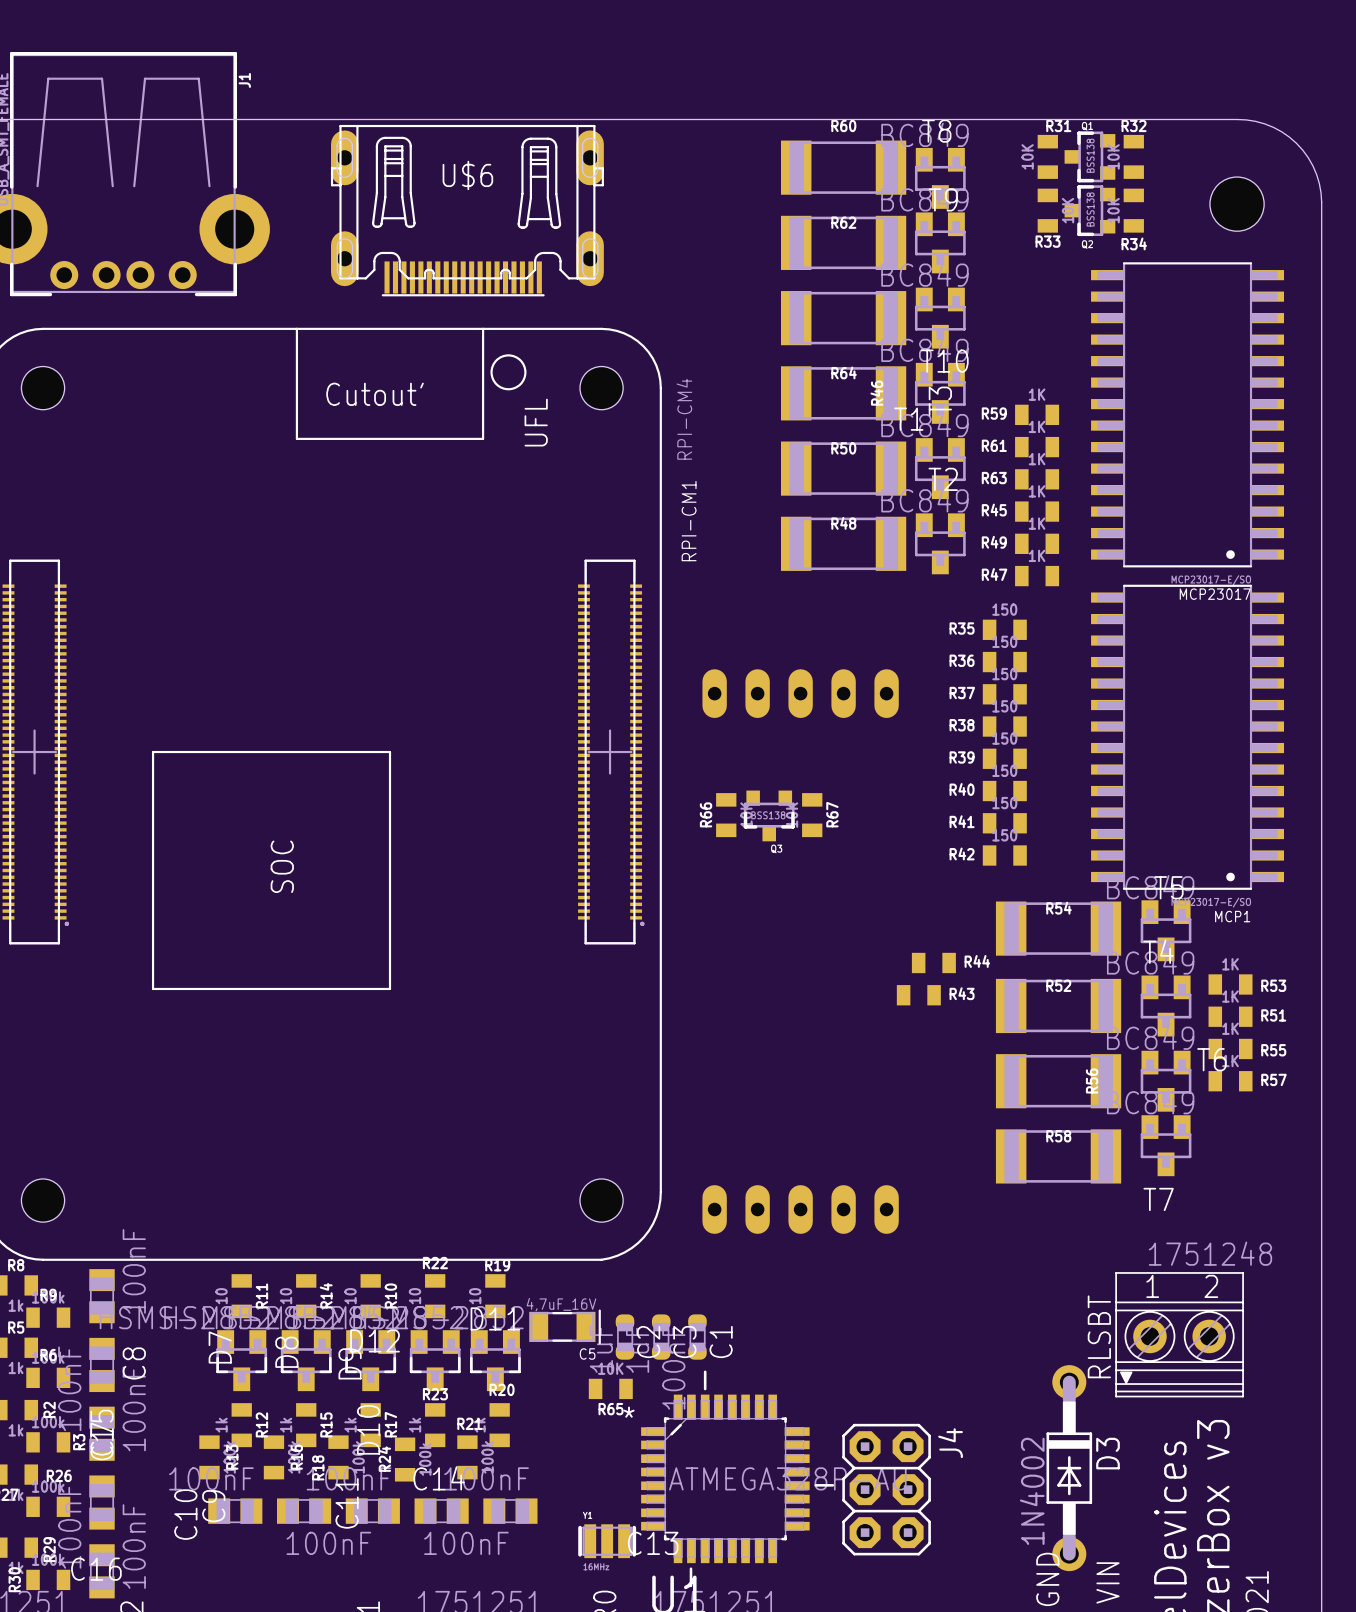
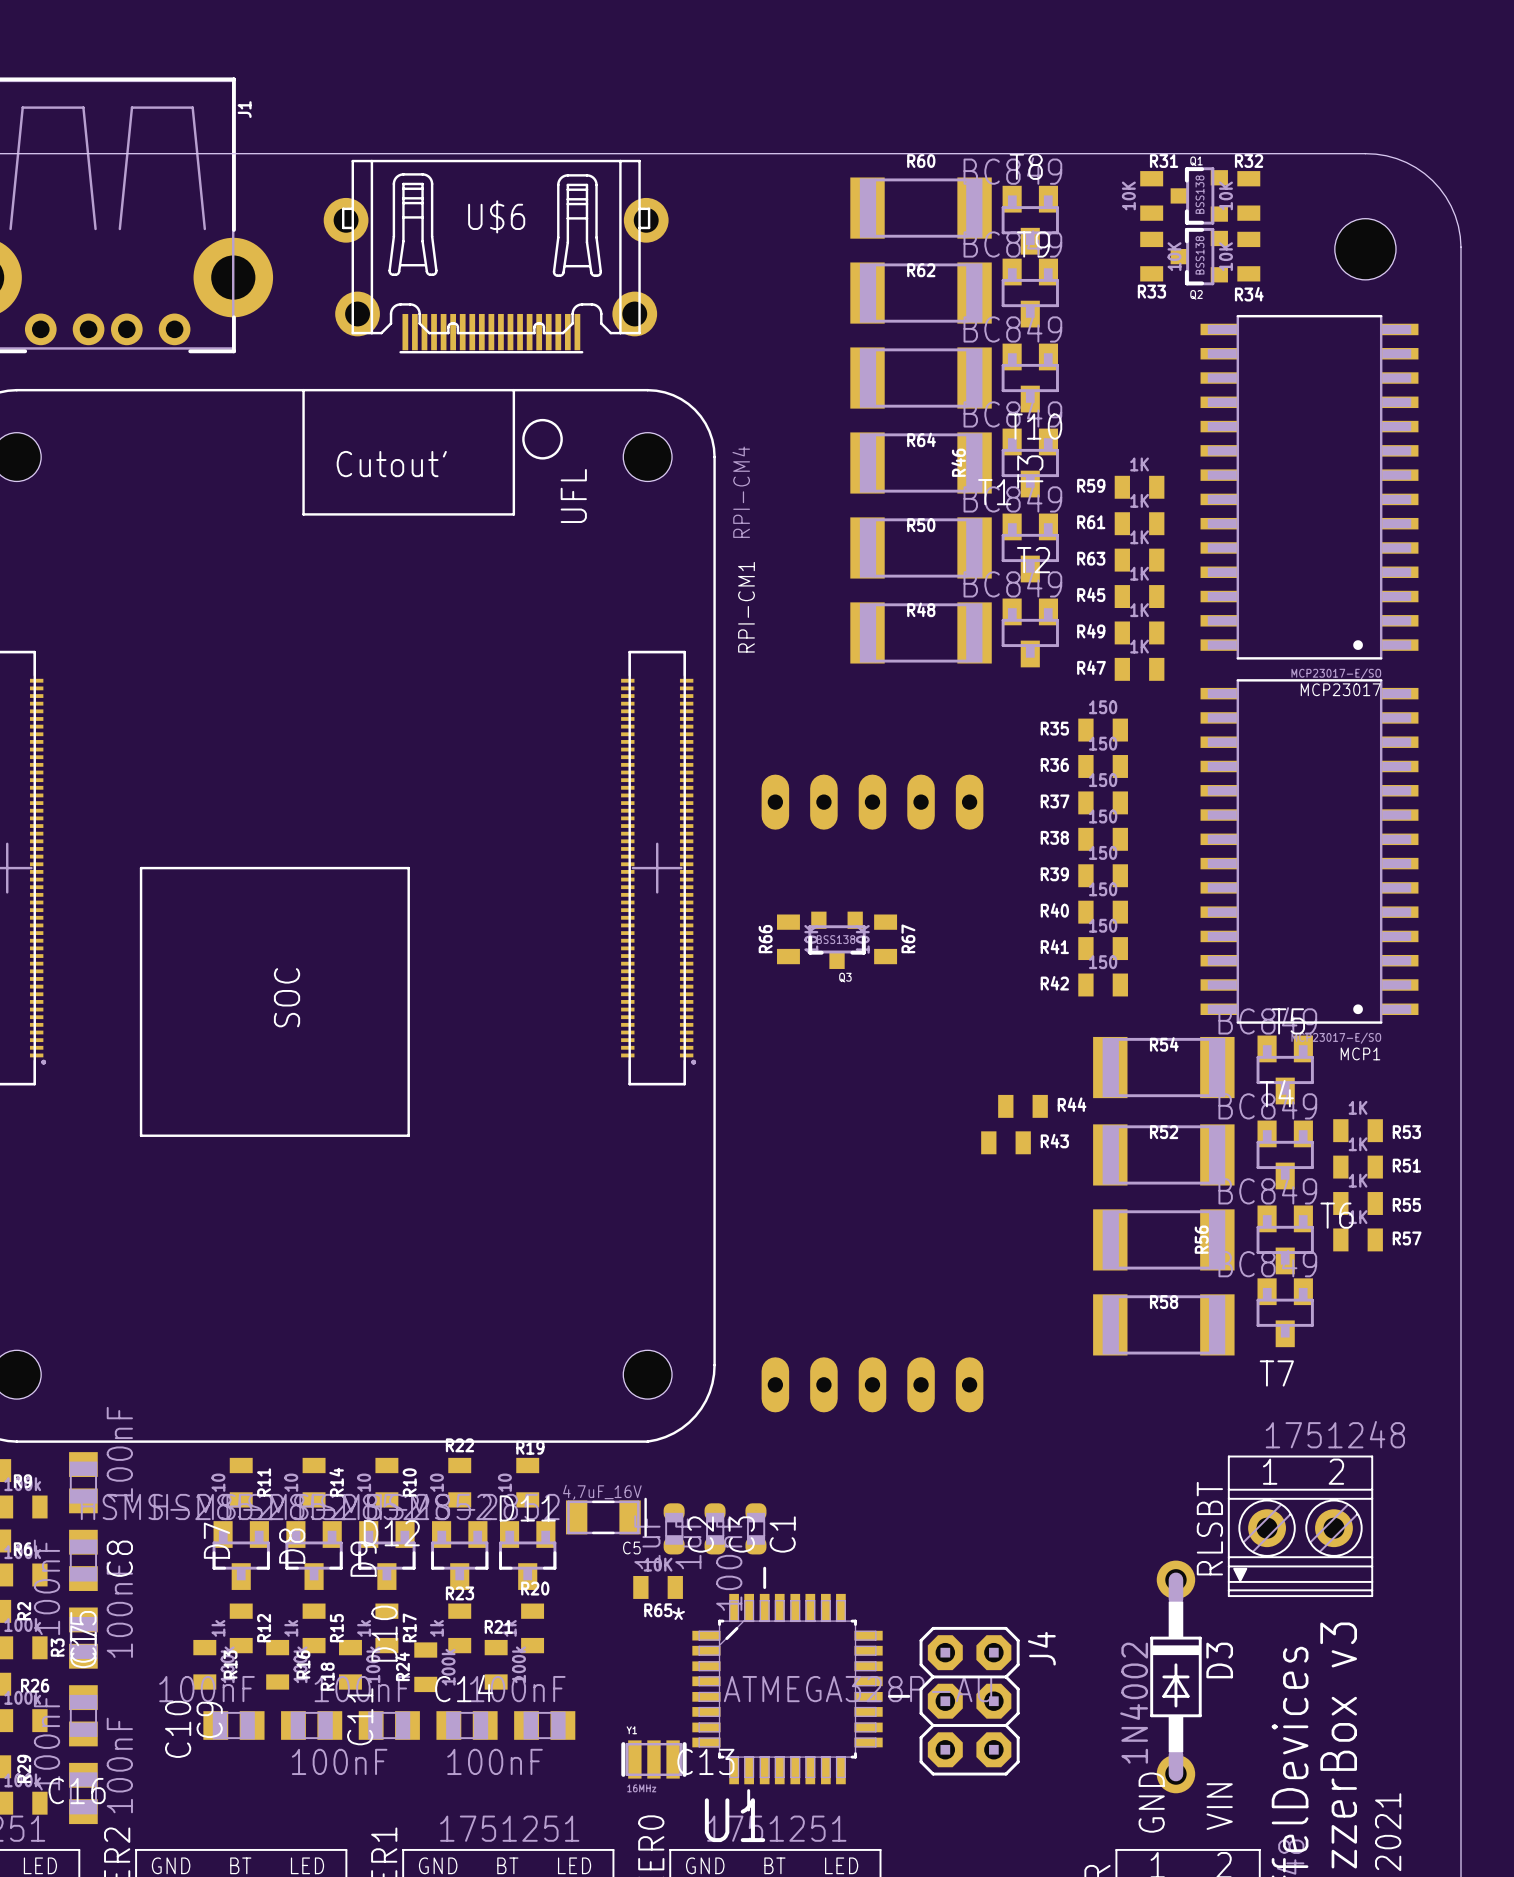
U$6 footprint: [330, 124, 604, 297] -> [323, 159, 669, 354]

